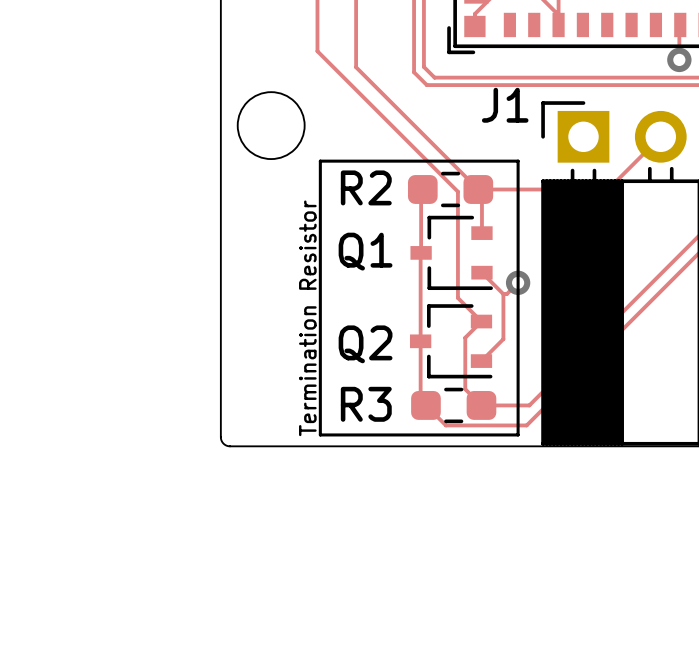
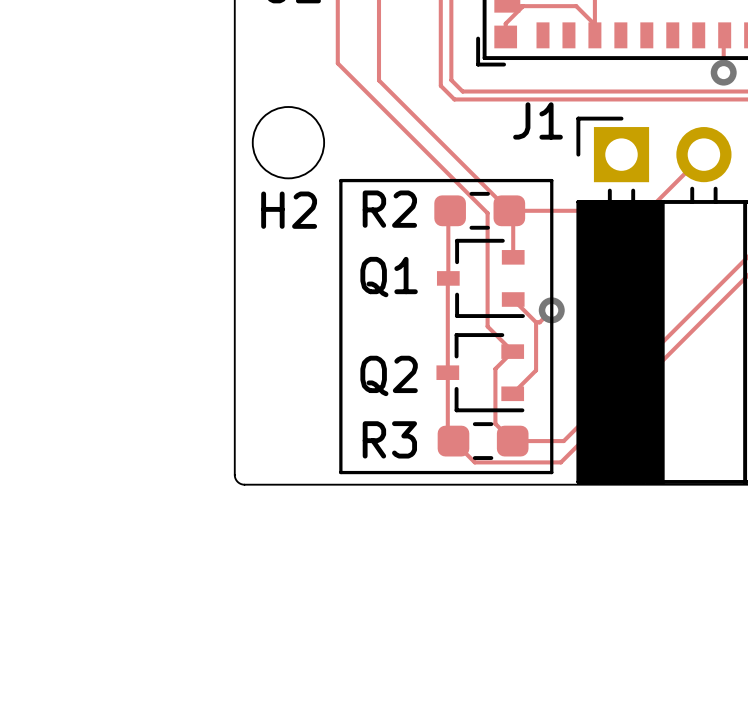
H2 name: none -> H2 (289, 210)
text: Termination Resistor (307, 318) -> none

